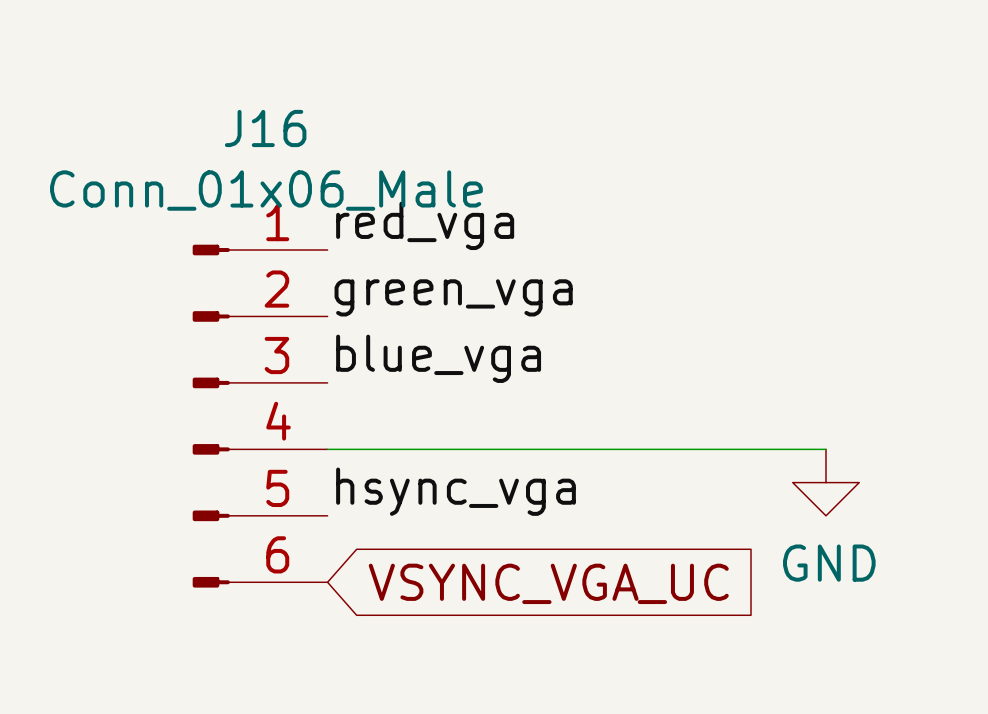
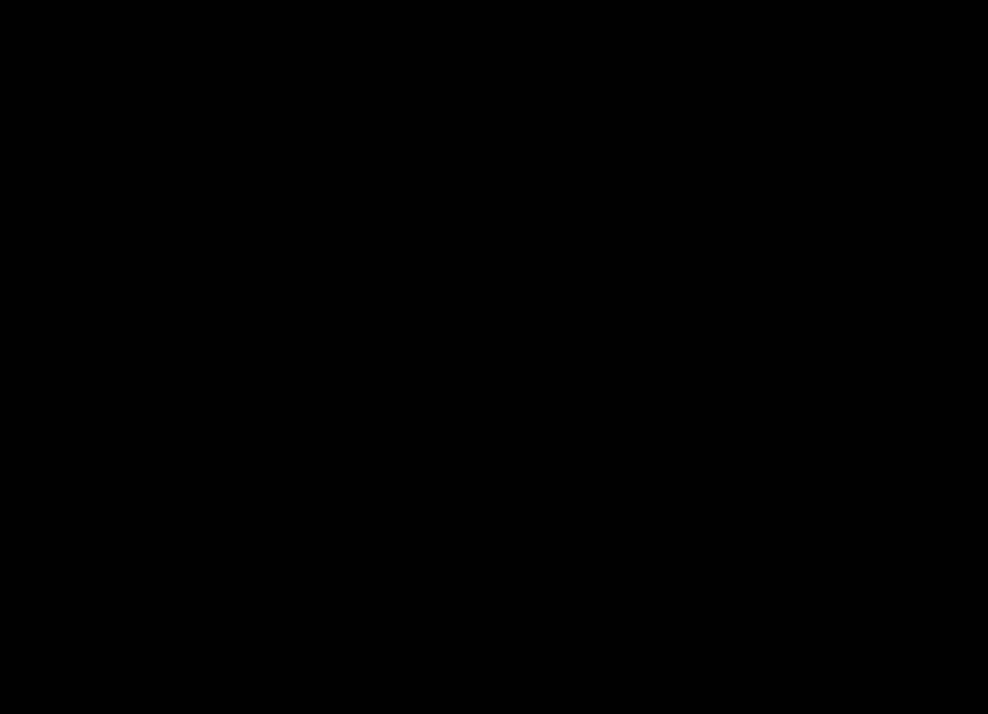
label: red_vga (425, 225) -> none
label: green_vga (453, 297) -> none
label: blue_vga (438, 358) -> none
J16: Conn_01x06_Male (260, 416) -> none
wire: (327, 449) (825, 449) -> none
power symbol: GND (825, 482) -> none
label: hsync_vga (455, 491) -> none
global label: VSYNC_VGA_UC (548, 583) -> none

